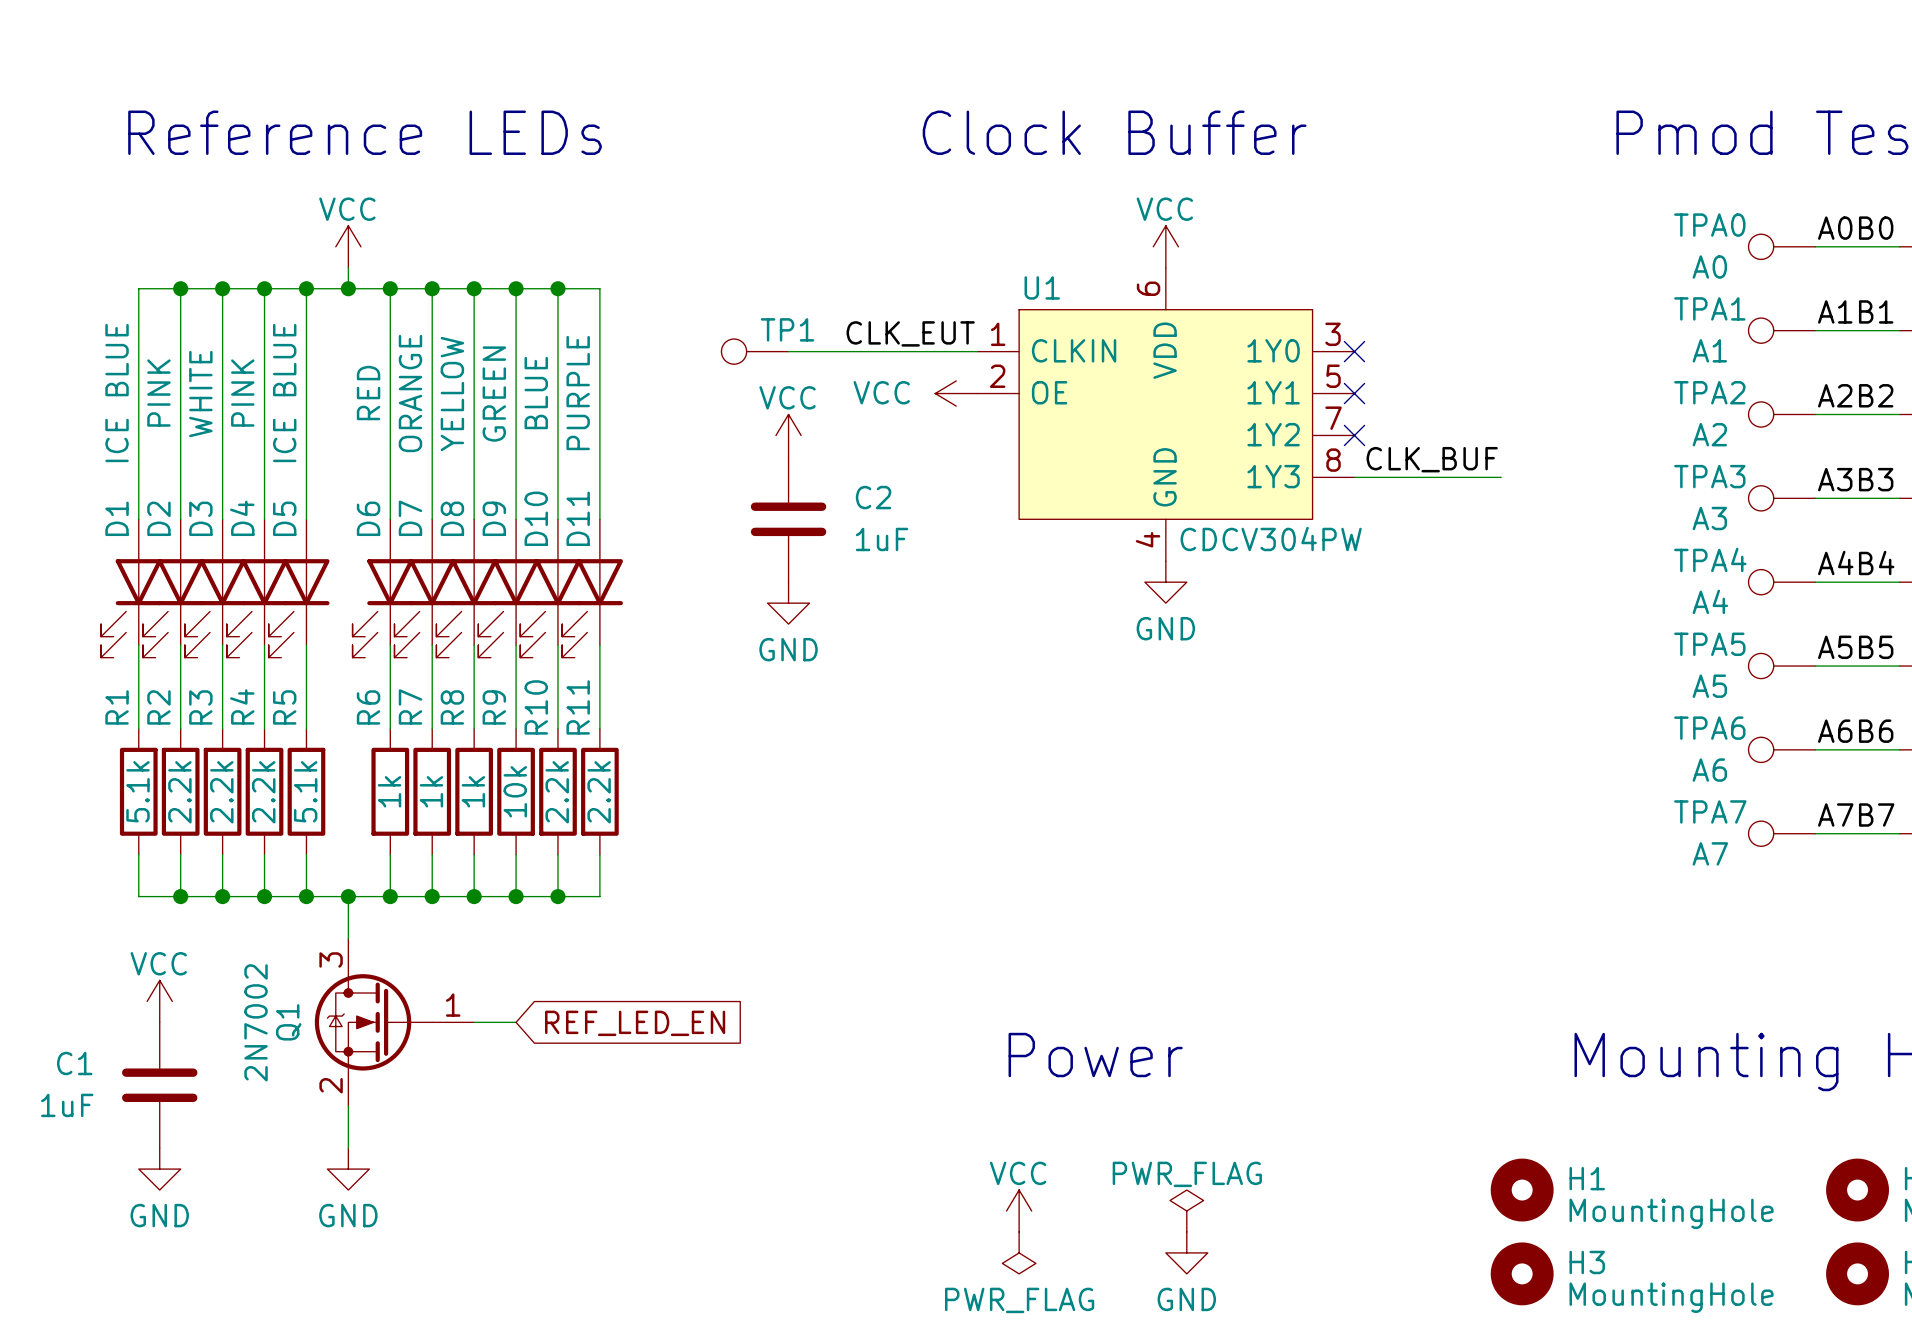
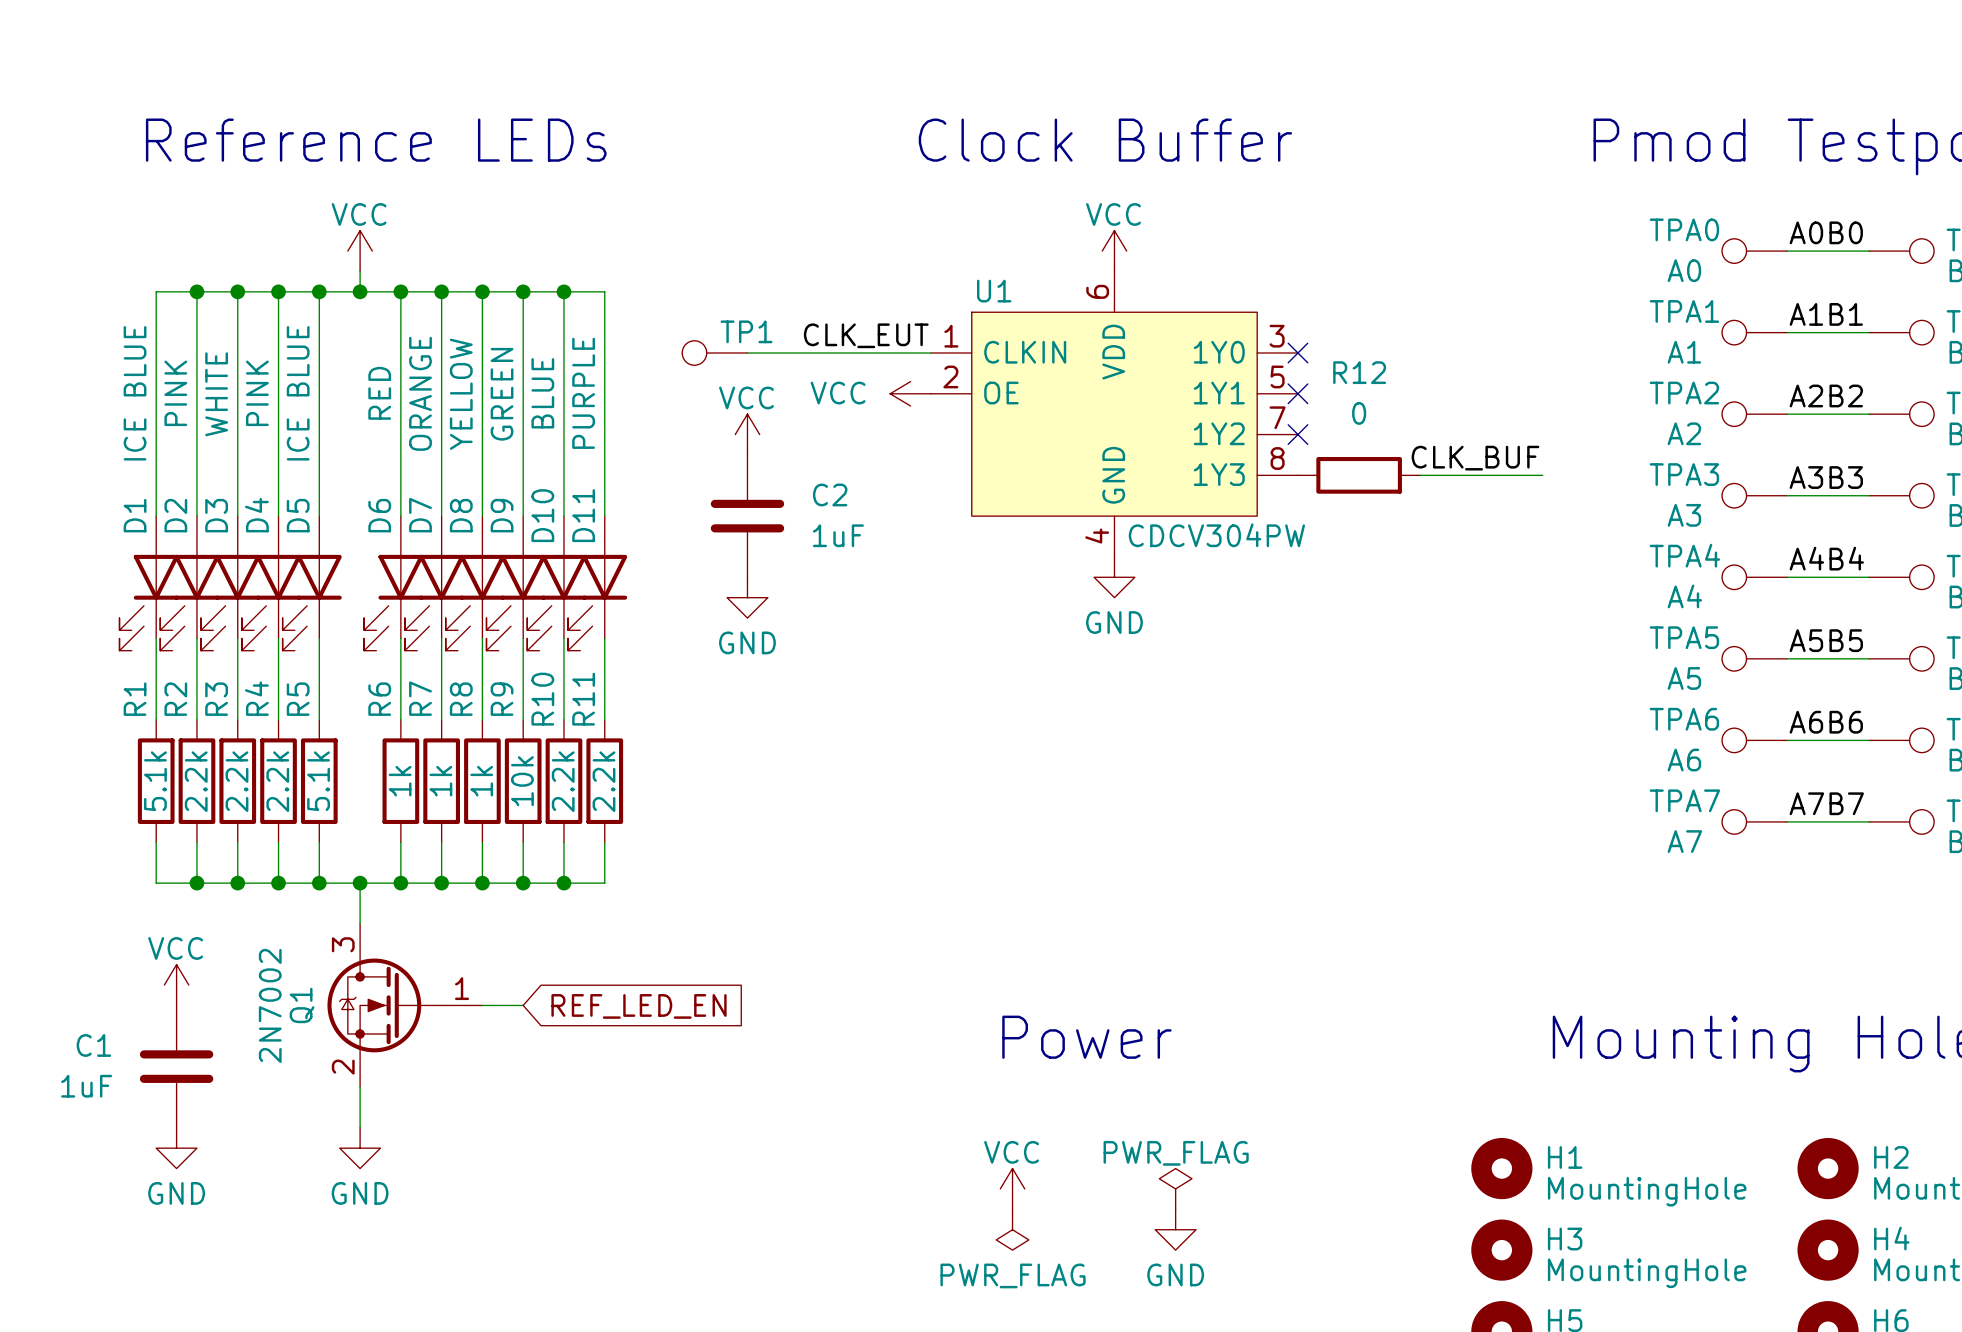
power symbol position: VCC (1165, 246) -> VCC (1114, 251)
label position: CLK_EUT (910, 333) -> CLK_EUT (866, 335)
TP1 position: (755, 351) -> (714, 353)
no-connect mark: none -> (1297, 353)
no-connect mark: (1354, 351) -> none
power symbol position: VCC (956, 393) -> VCC (910, 393)
no-connect mark: none -> (1297, 393)
no-connect mark: (1354, 393) -> none
U1 position: (1165, 414) -> (1114, 414)
power symbol position: VCC (788, 435) -> VCC (747, 434)
no-connect mark: none -> (1297, 434)
no-connect mark: (1354, 435) -> none
label position: CLK_BUF (1432, 459) -> CLK_BUF (1475, 458)
wire: (1354, 477) (1438, 477) -> none
R12: none -> 0 (1359, 475)
wire: none -> (1481, 475) (1542, 475)
C2 position: (788, 519) -> (747, 516)
power symbol position: GND (1165, 582) -> GND (1114, 577)
power symbol position: GND (788, 603) -> GND (747, 597)

